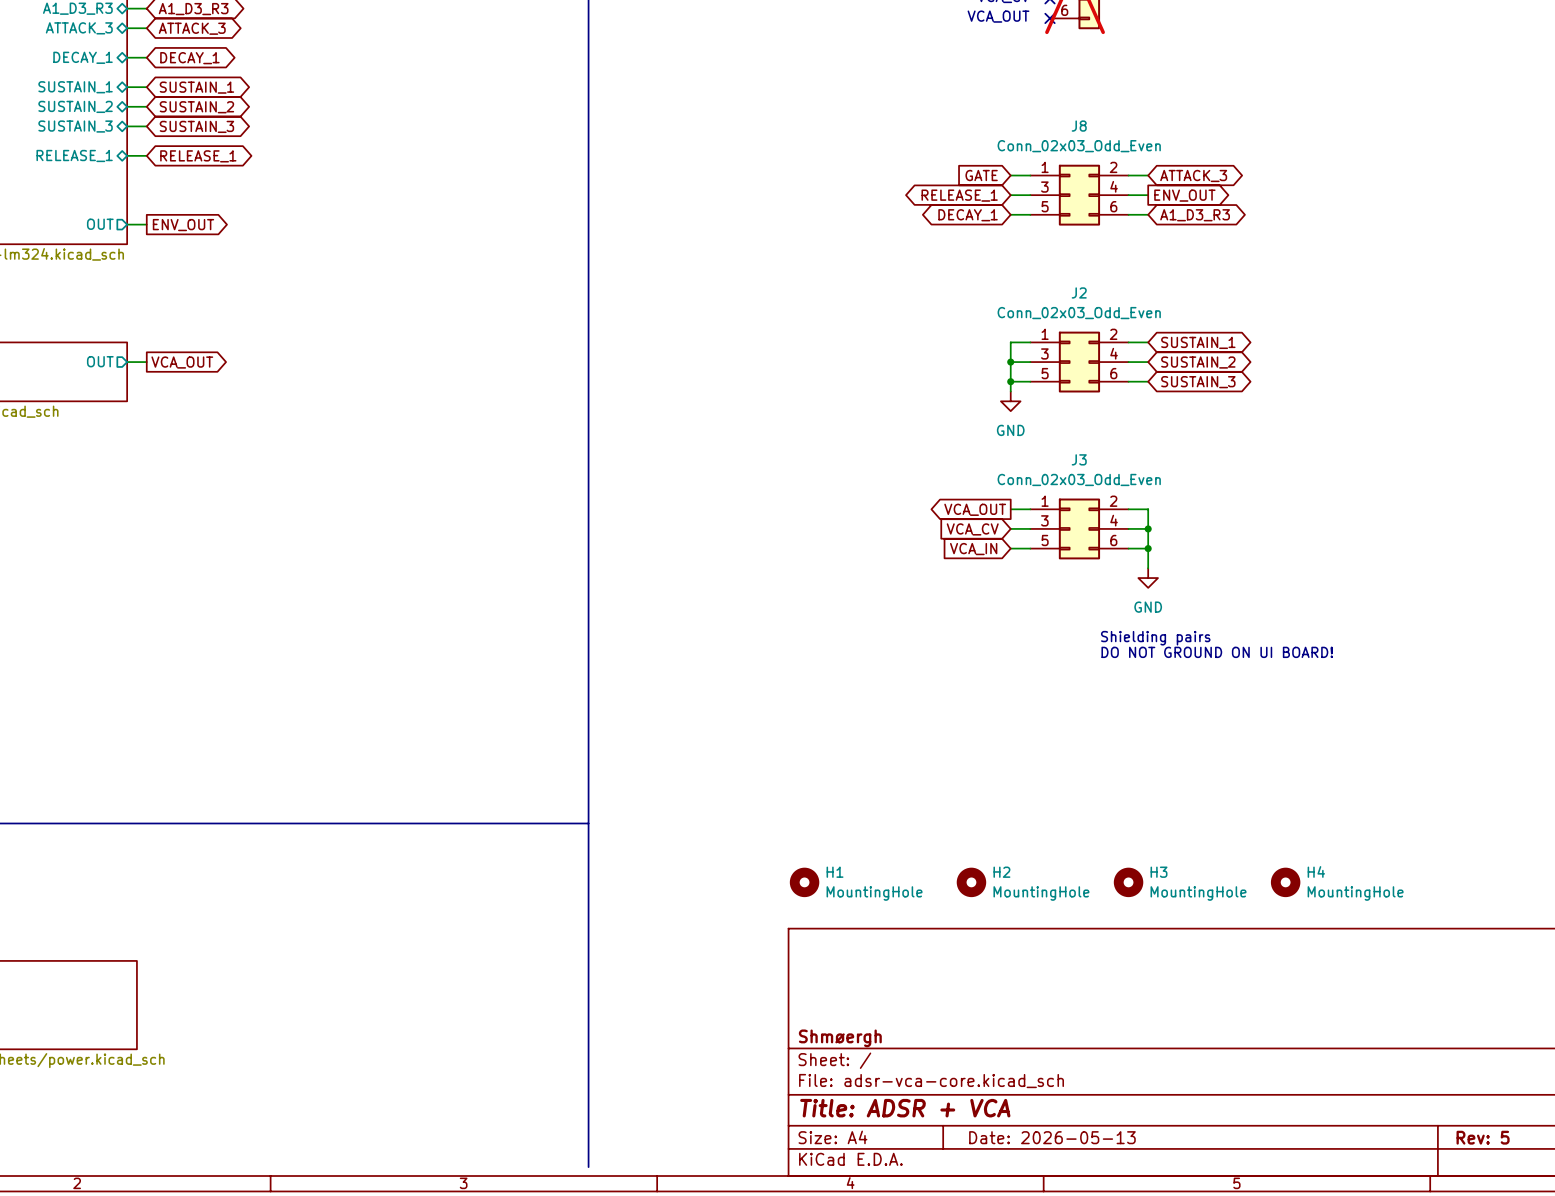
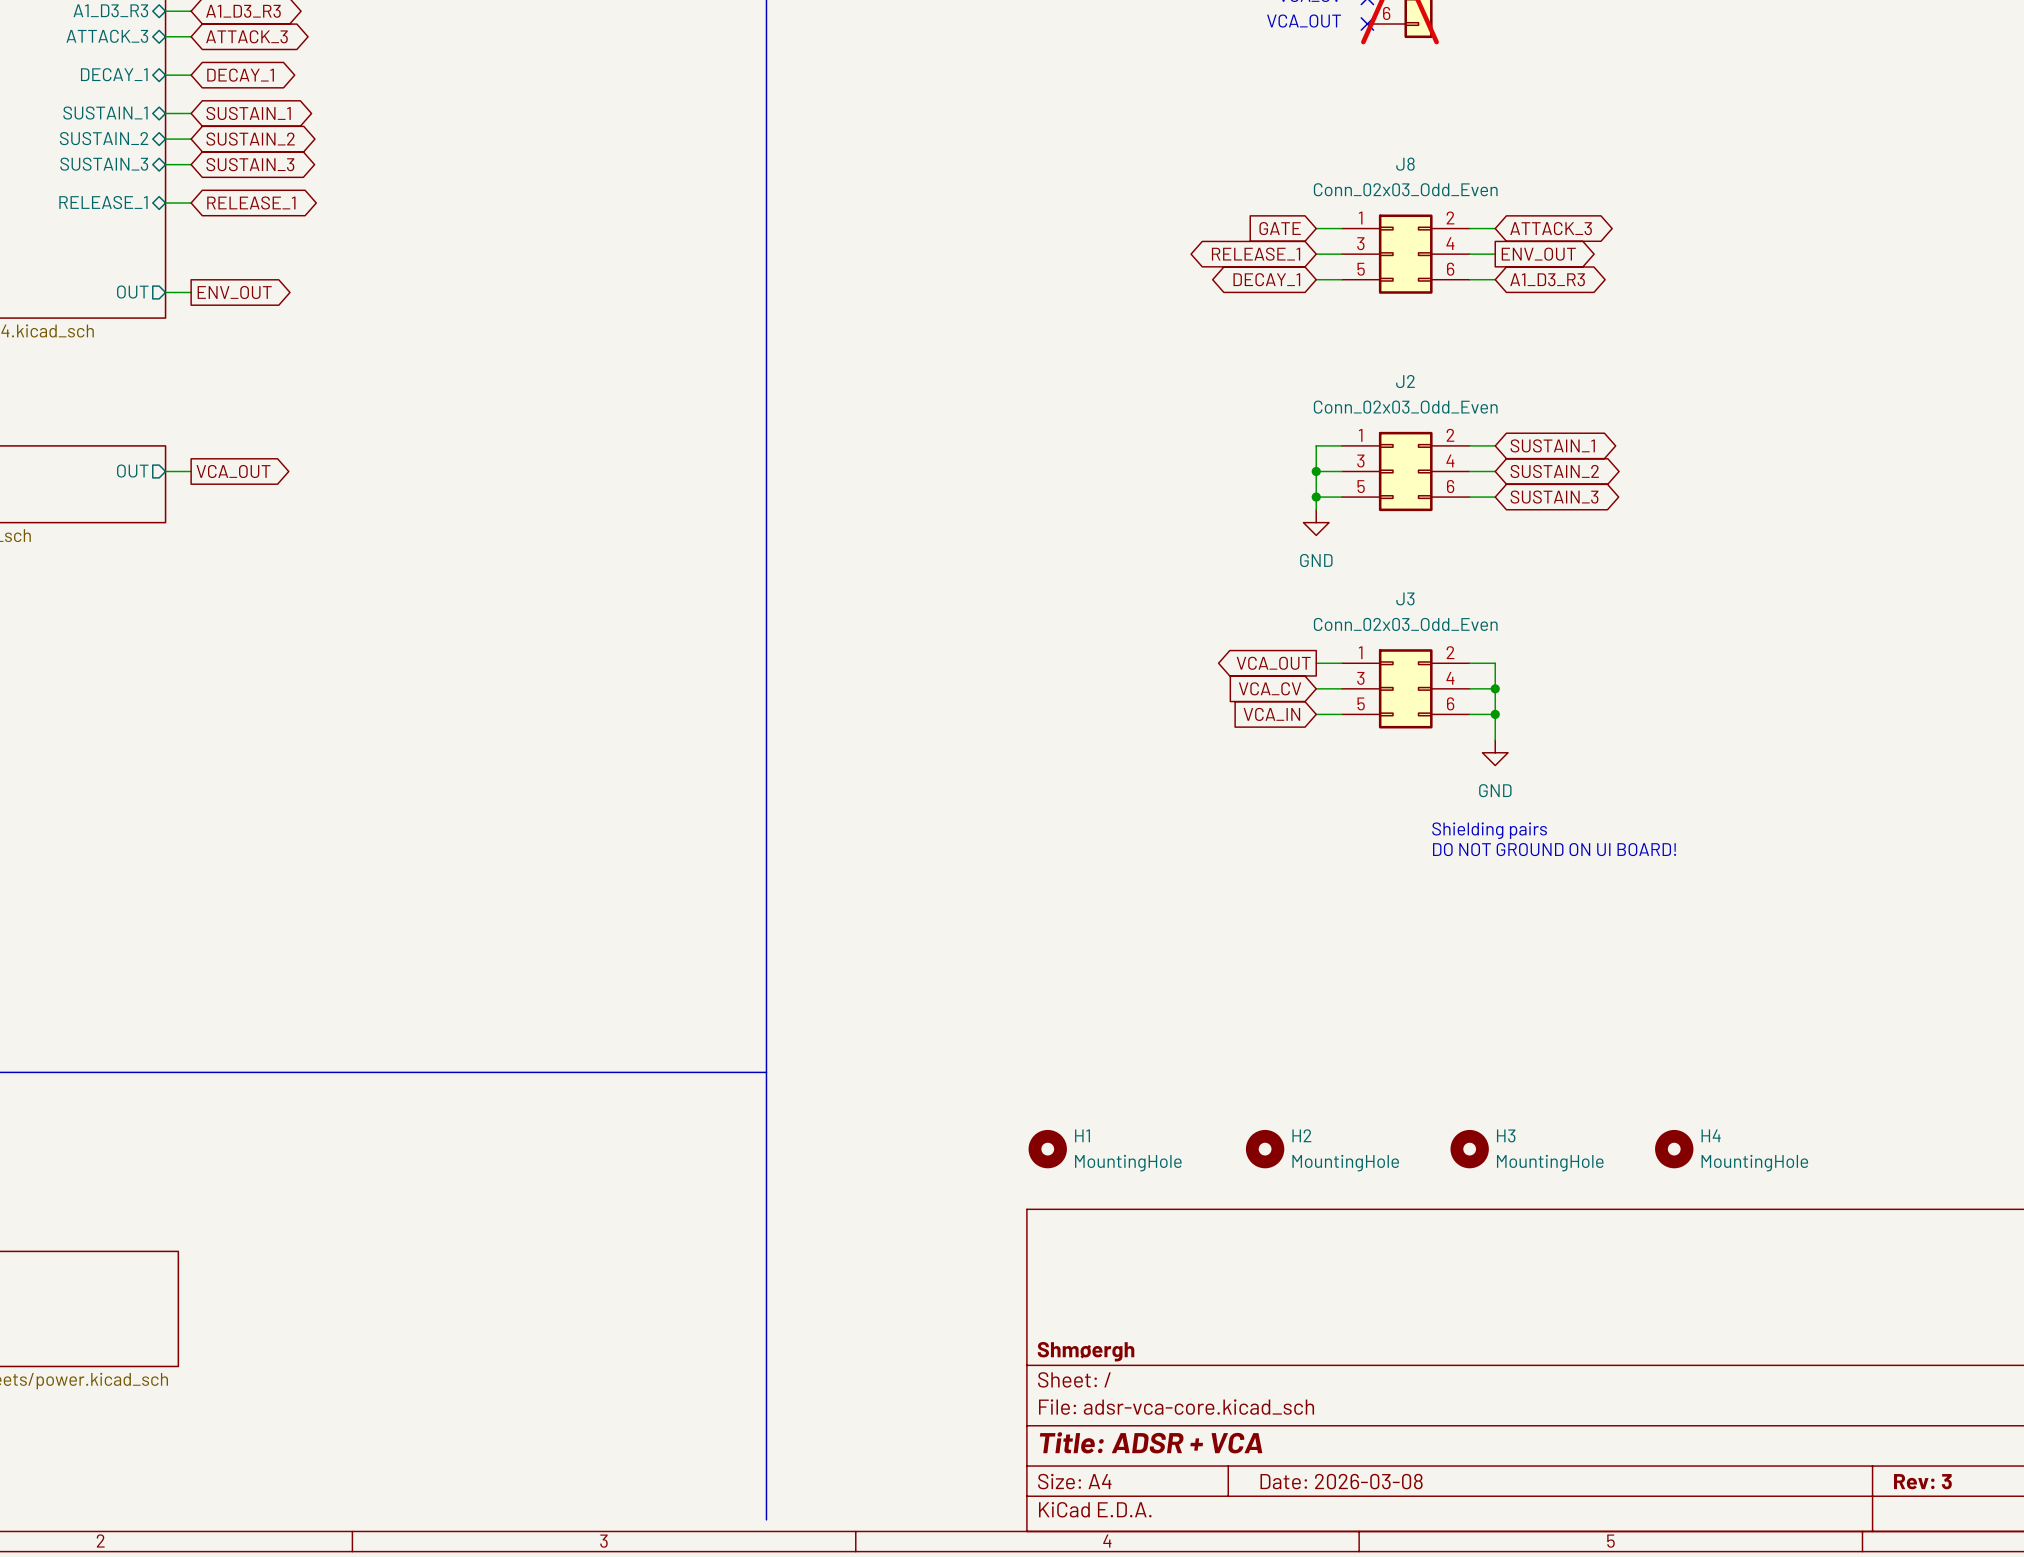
title block: Date: 2026-05-13 (1052, 1137) -> Date: 2026-03-08 (1341, 1481)
title block: Rev: 5 (1483, 1137) -> Rev: 3 (1922, 1481)

